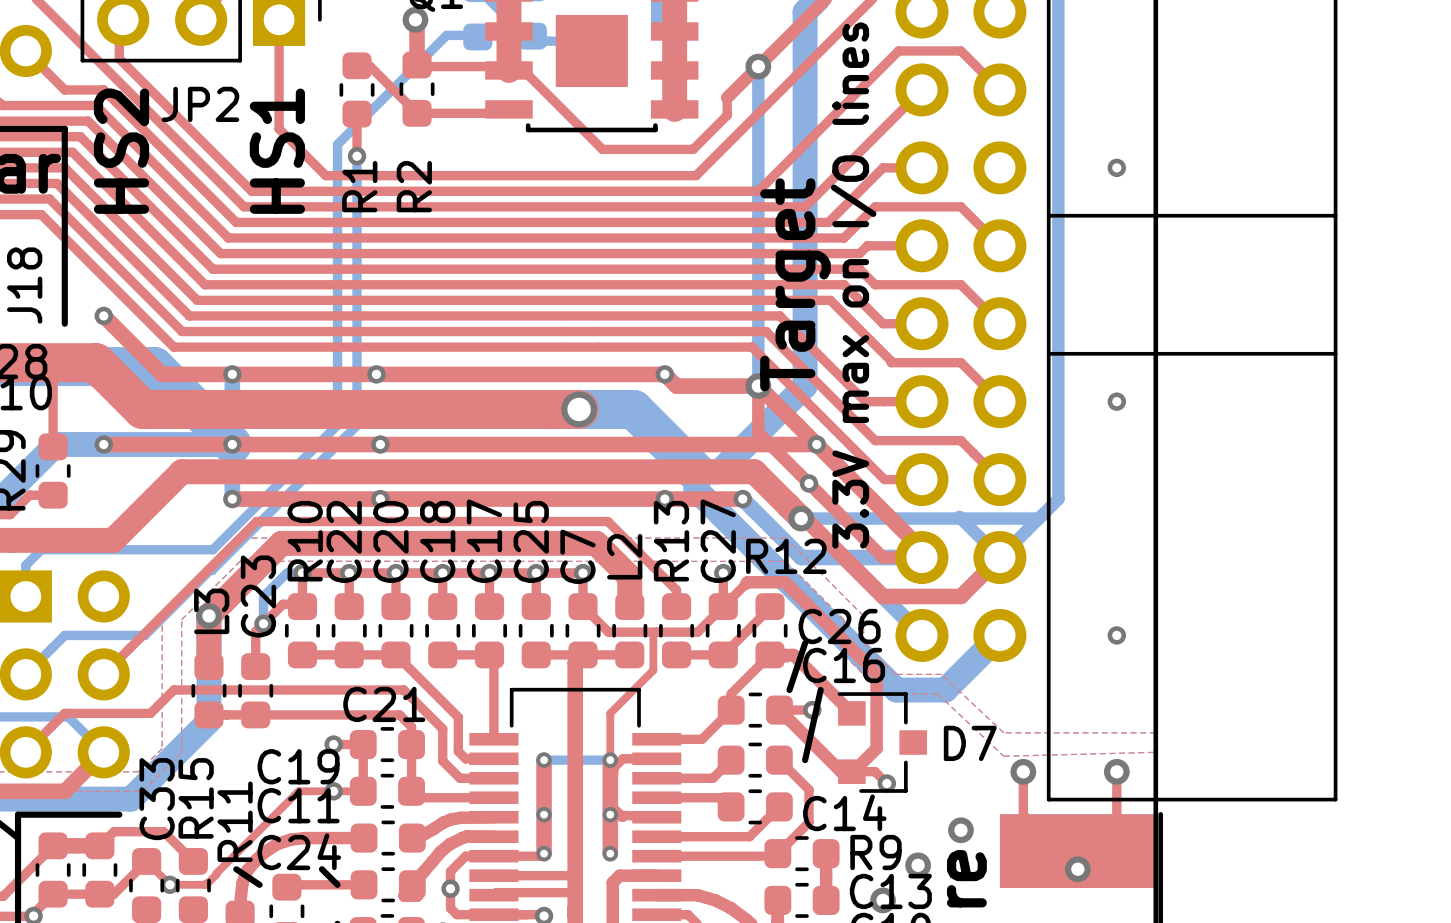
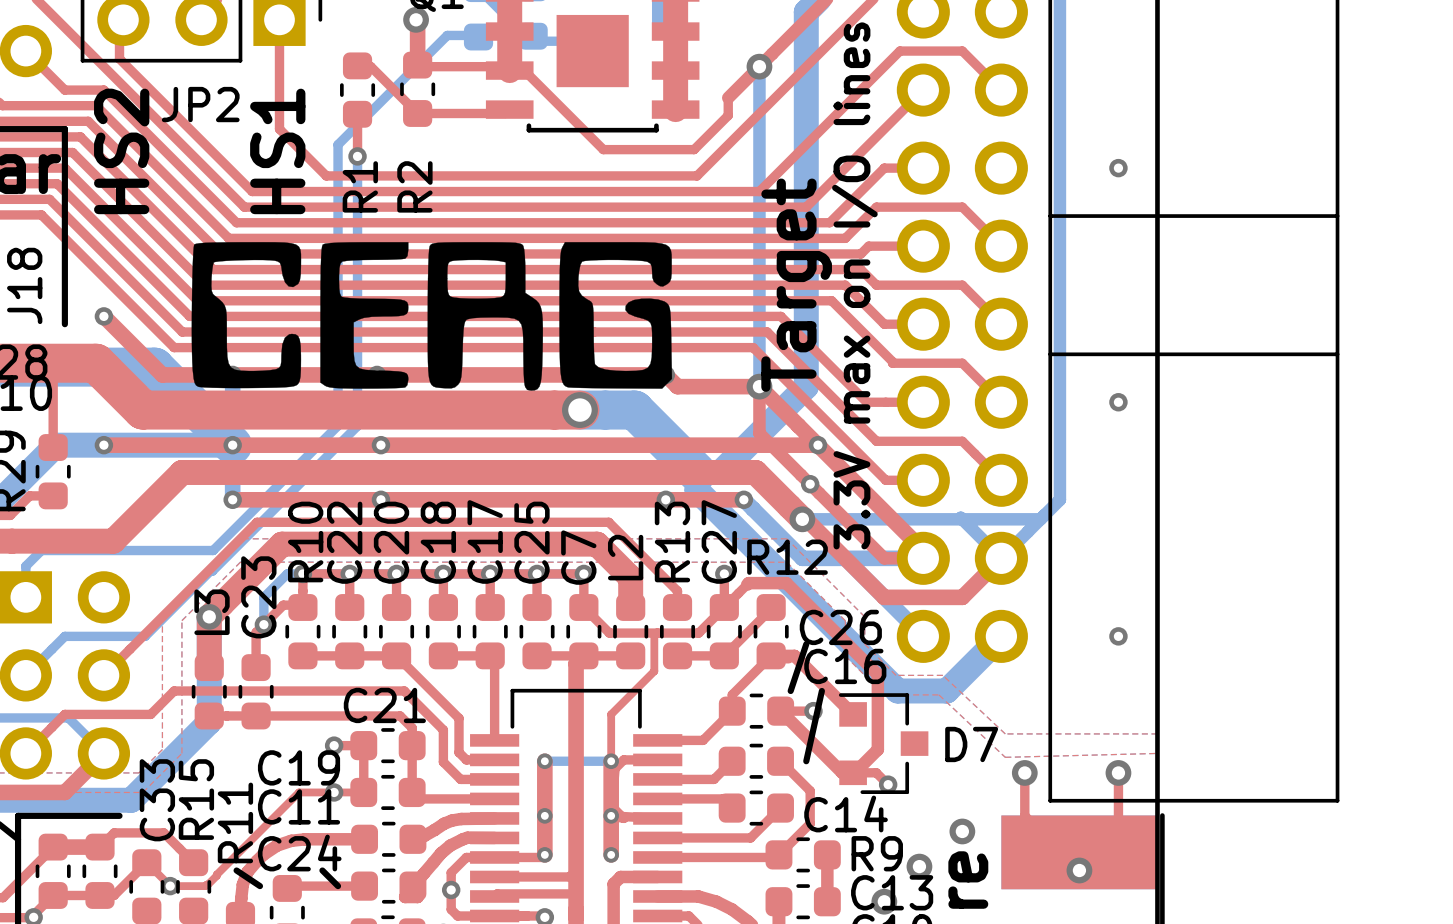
drawing: none -> [191, 242, 673, 391]

